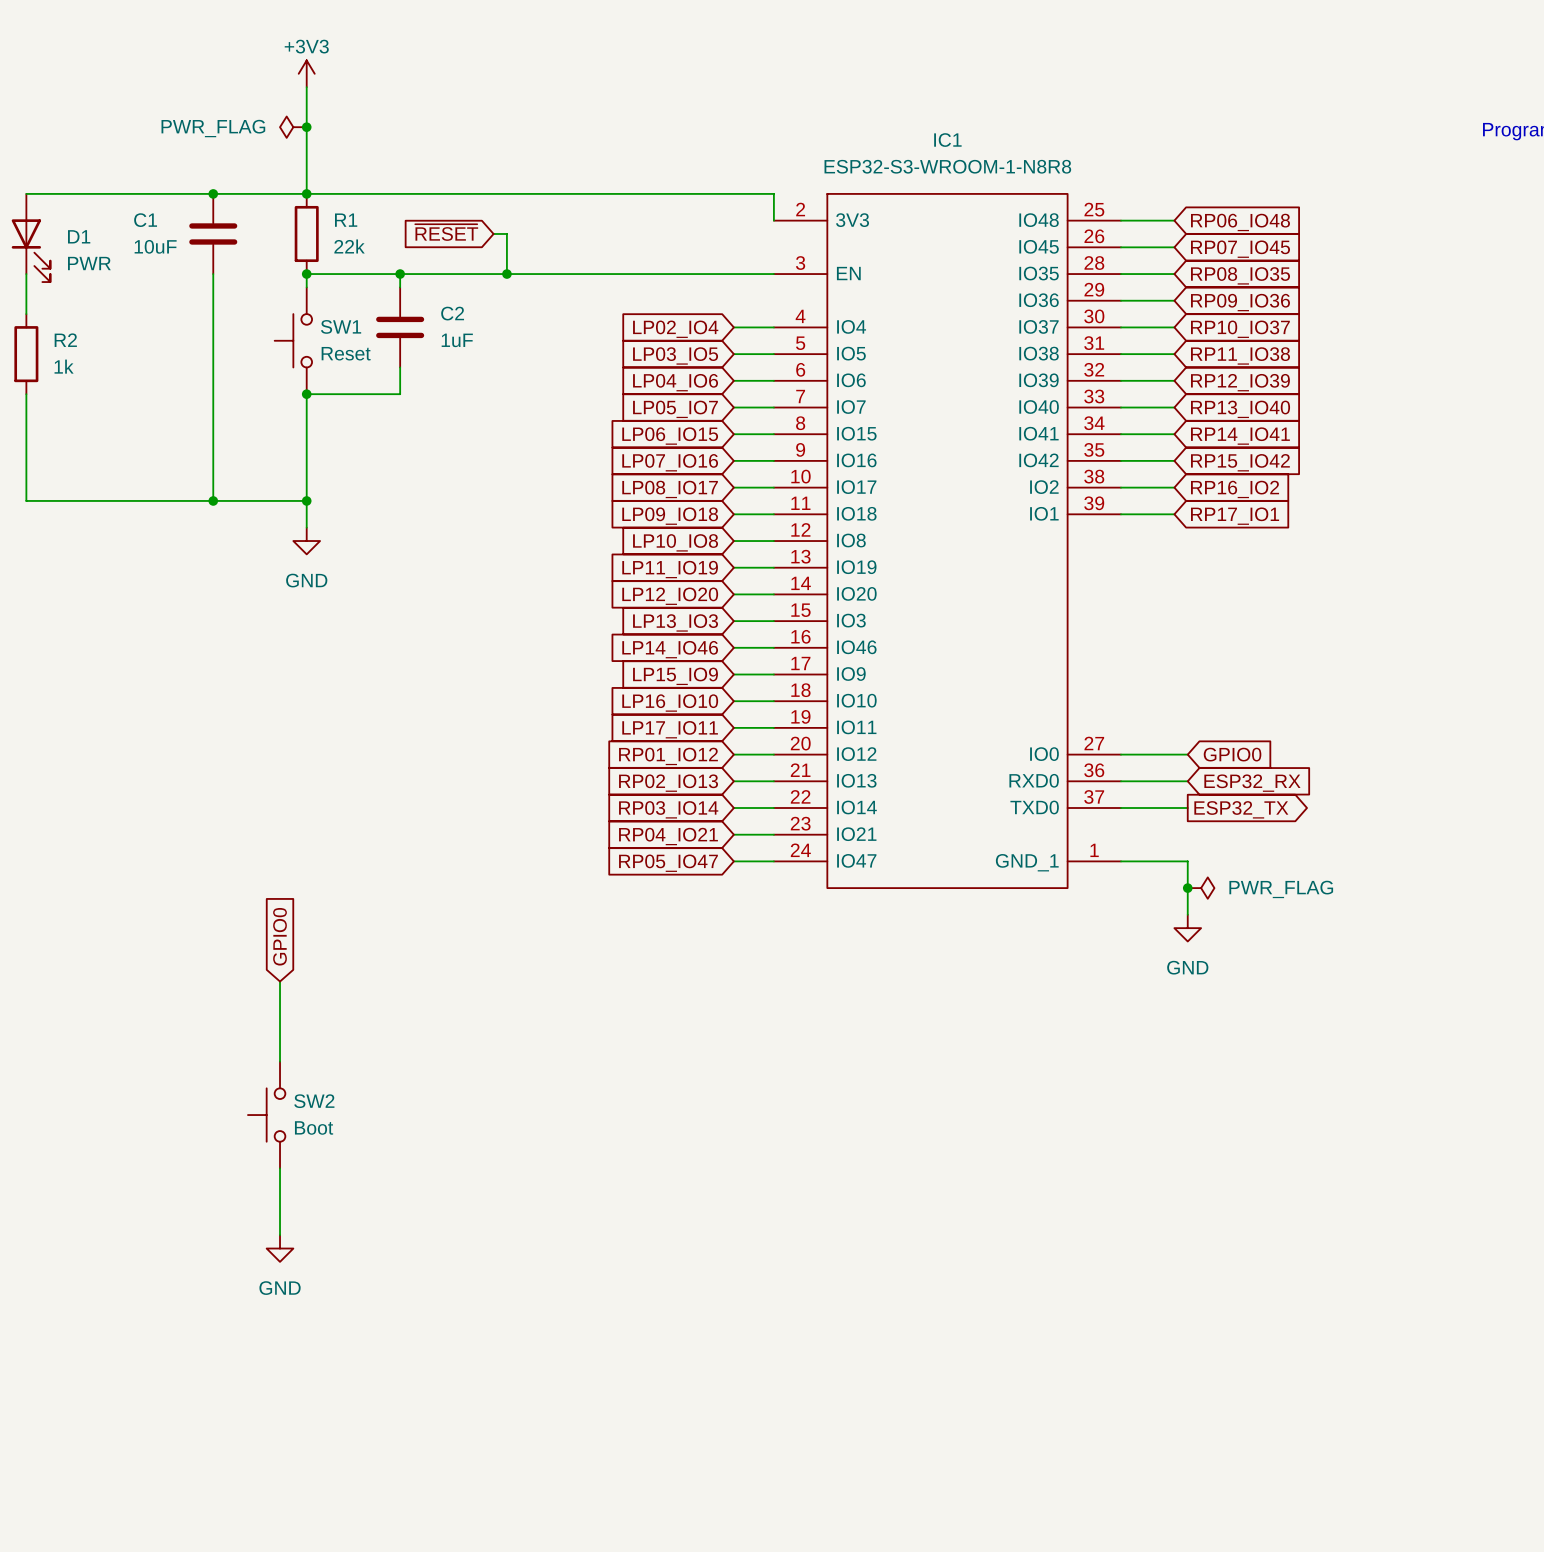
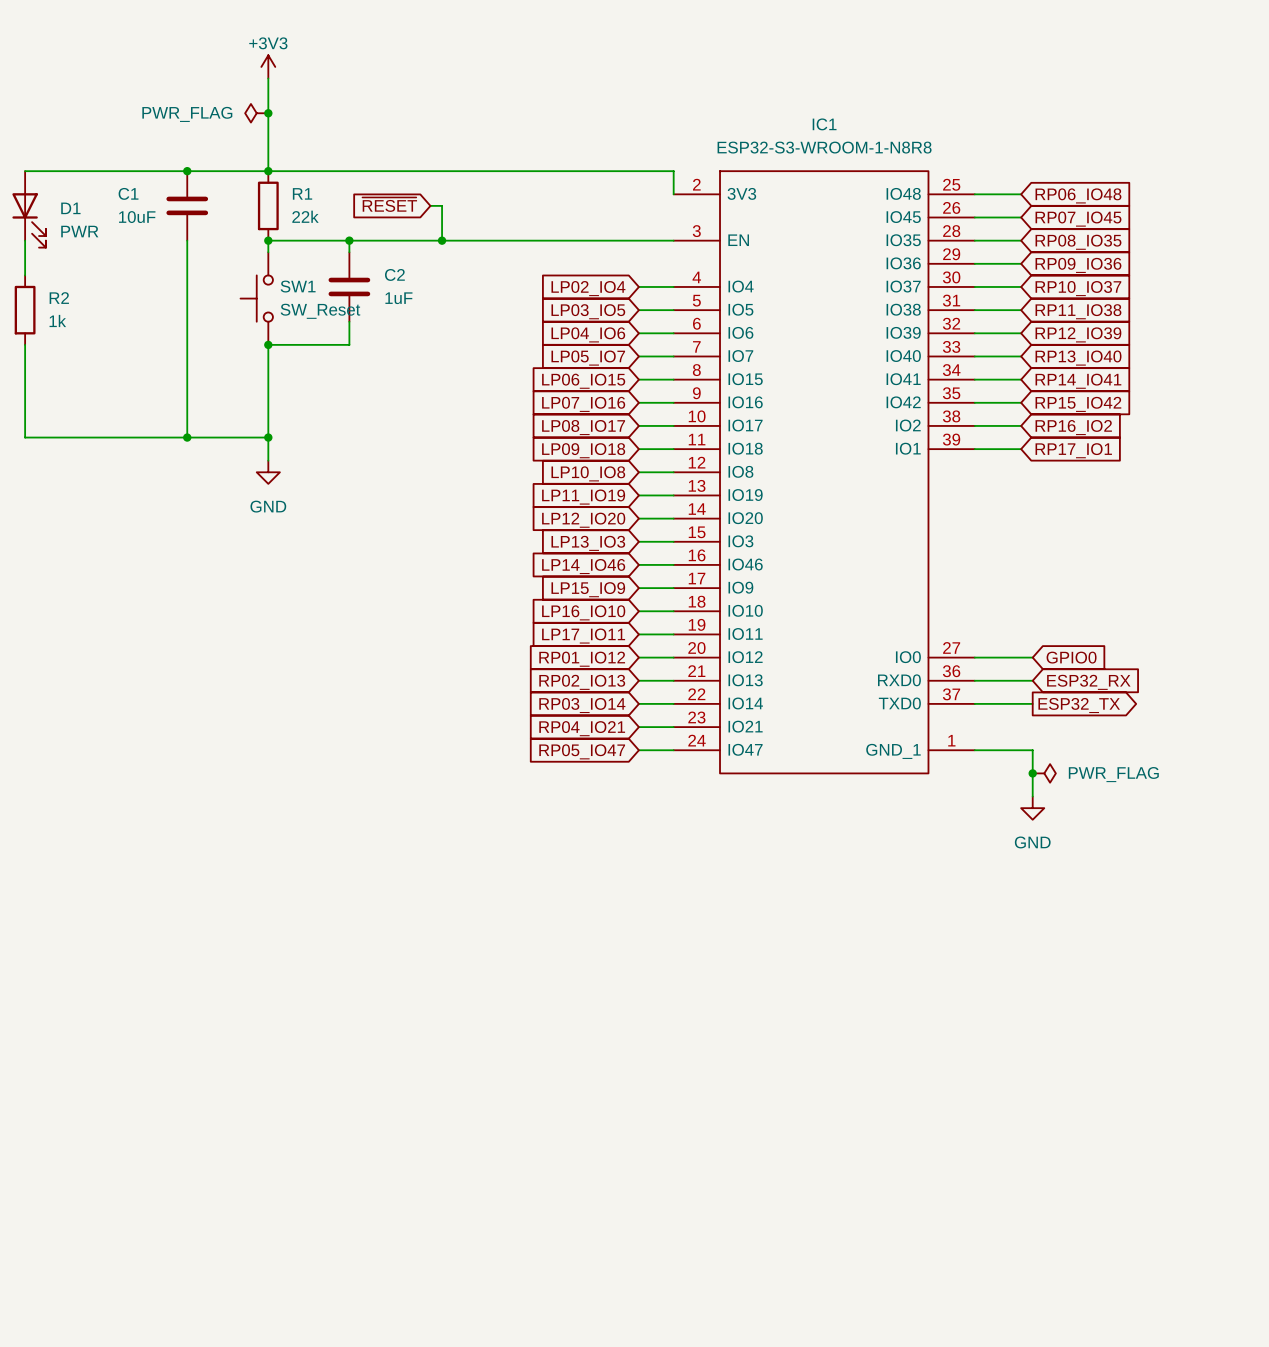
SW1 value: Reset (346, 353) -> SW_Reset (320, 311)
global label: GPIO0 (280, 936) -> none
wire: (280, 981) (280, 1061) -> none
SW2: Boot (266, 1115) -> none
wire: (280, 1168) (280, 1235) -> none
power symbol: GND (280, 1248) -> none

